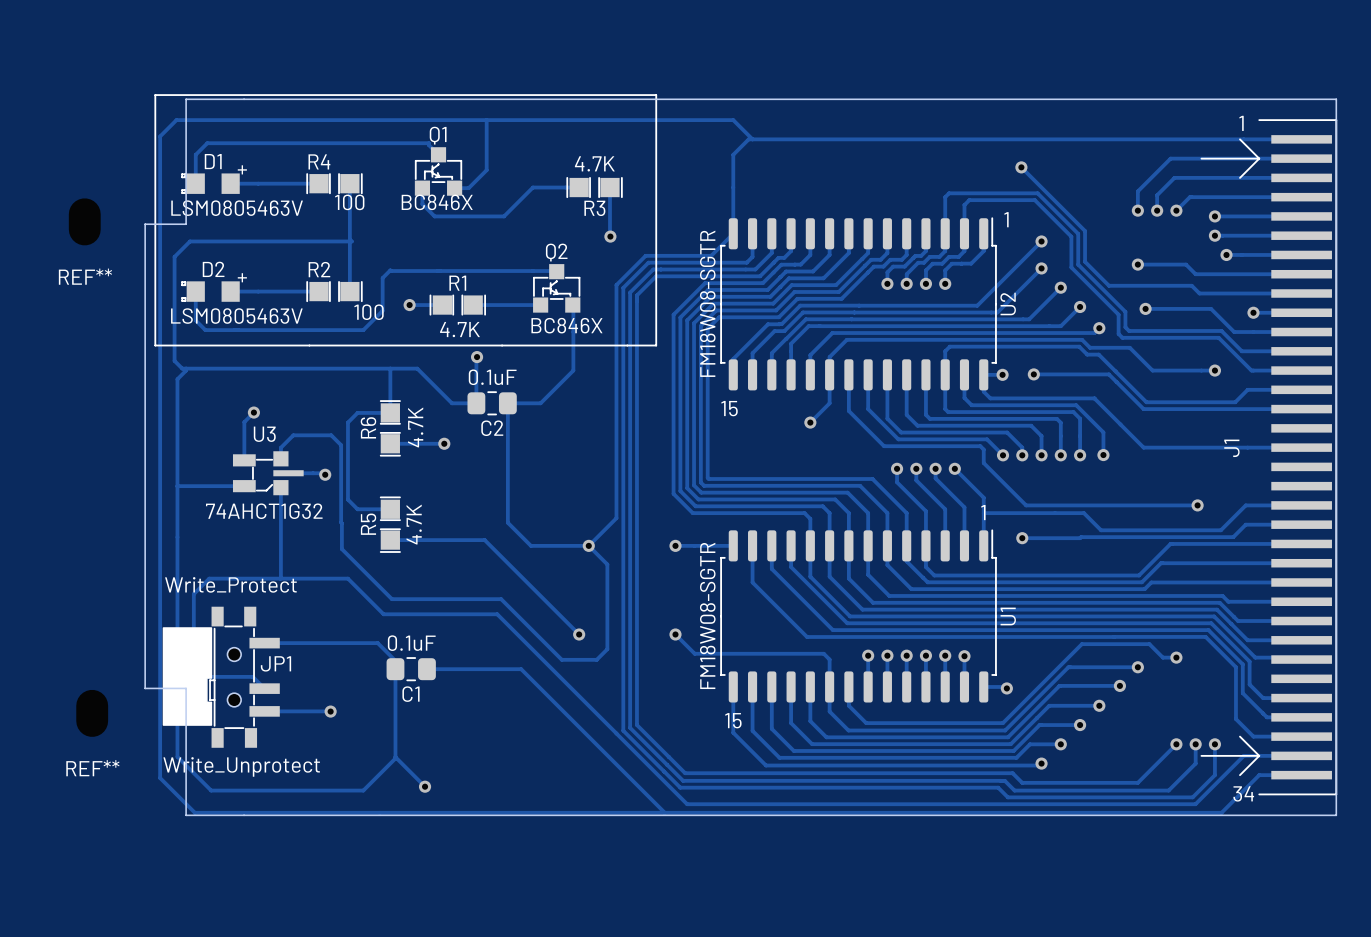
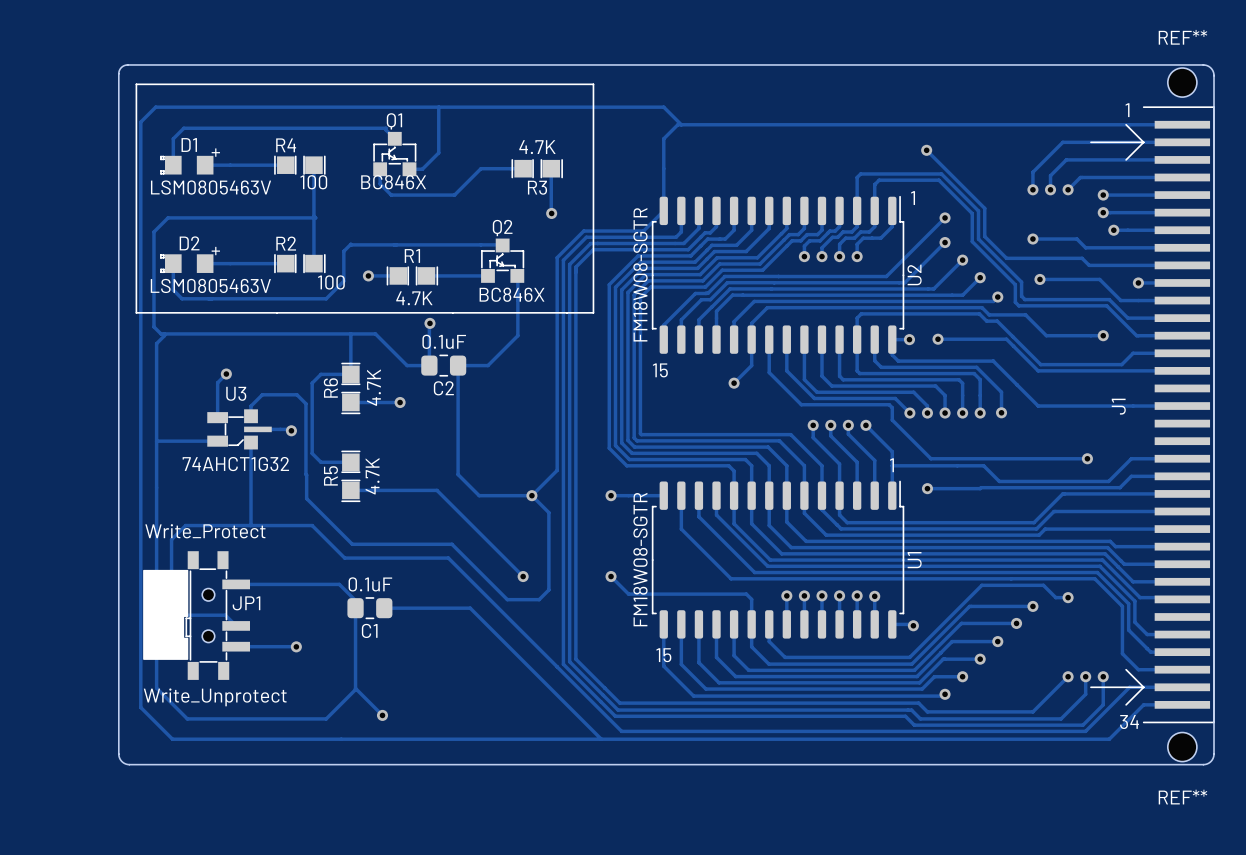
REF**: none -> (1182, 82)
board edge: (1336, 99) (186, 99) (186, 224) (145, 224) (145, 688) (186, 688) (186, 815) (1336, 815) -> (1213, 88) (1213, 71) (1209, 67) (1203, 64) (127, 64) (121, 67) (118, 73) (118, 754) (124, 763) (1203, 764) (1209, 762) (1213, 758) (1213, 741)
REF**: (84, 221) -> none
REF**: (92, 713) -> none
REF**: none -> (1182, 747)

